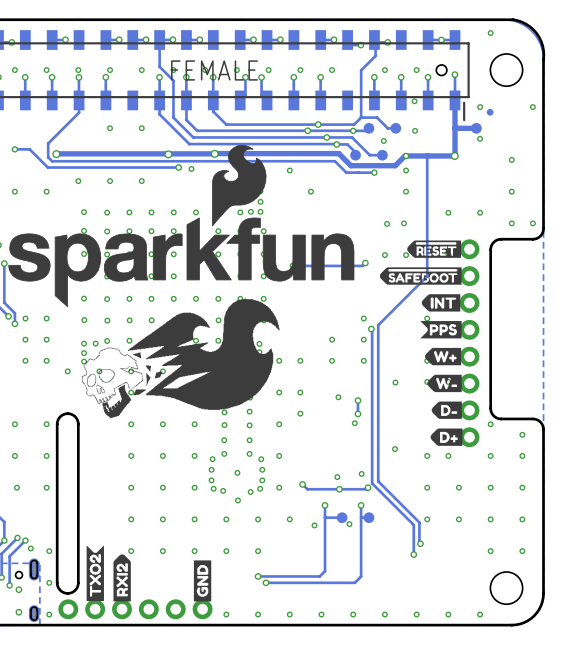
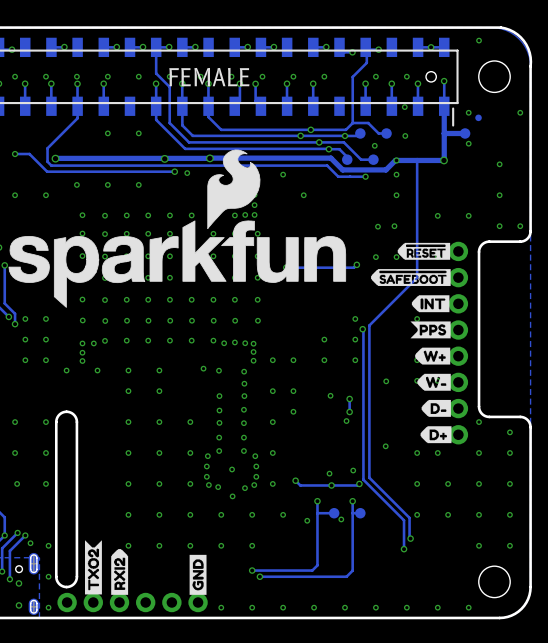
drawing: [82, 298, 280, 419] -> none

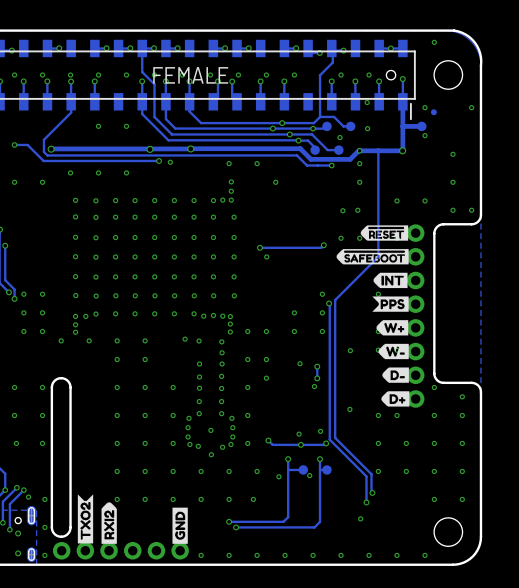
drawing: [8, 149, 347, 308] -> none
via: none -> (253, 499)
via: none -> (360, 518)

